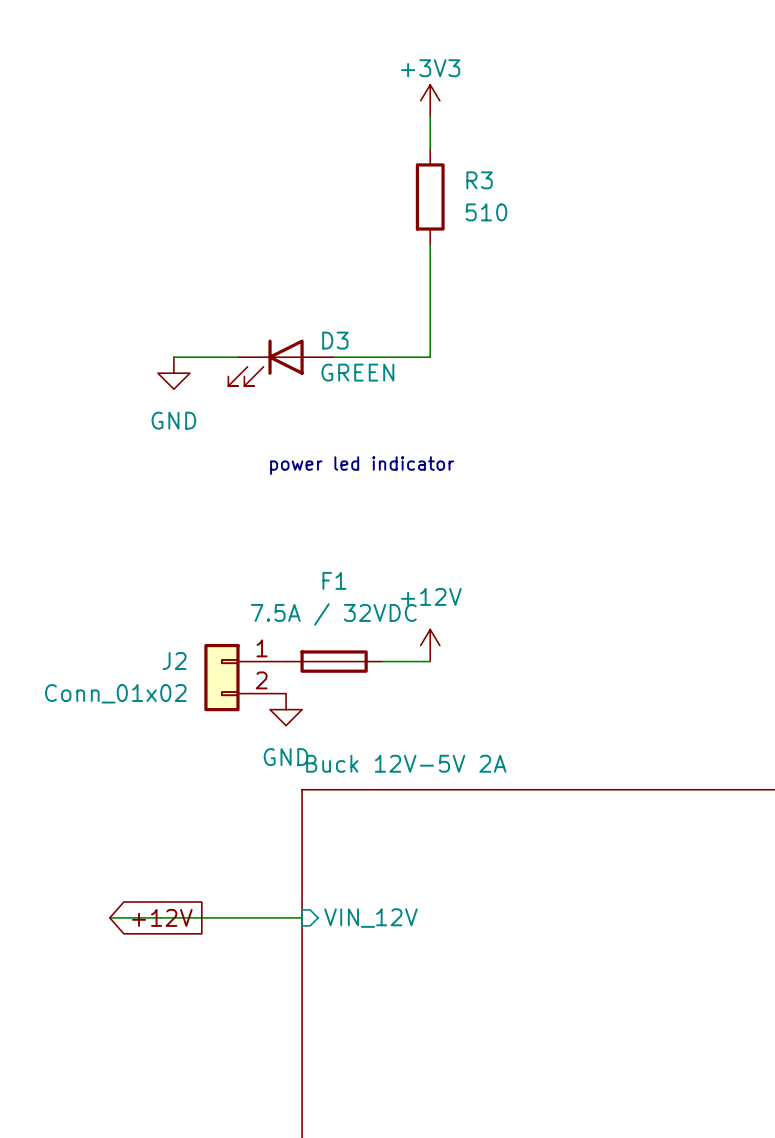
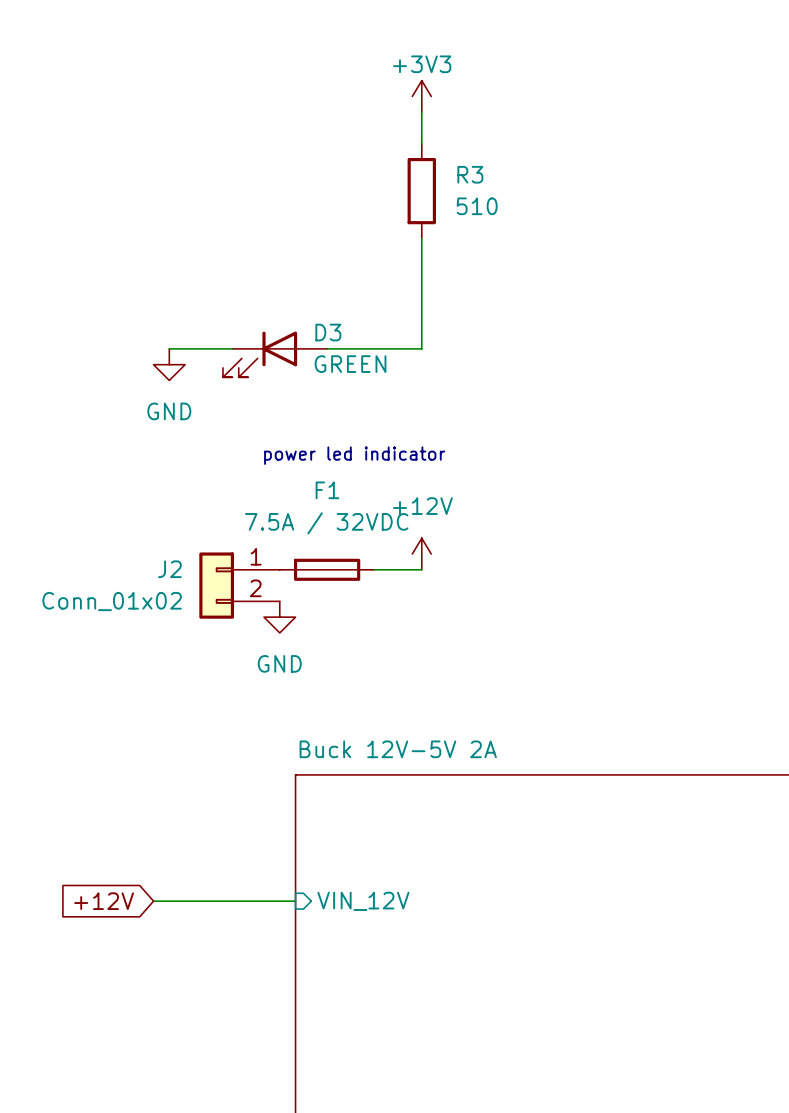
power symbol position: +12V (430, 645) -> +12V (421, 554)
F1 position: (334, 661) -> (327, 569)
wire: (382, 661) (430, 661) -> (374, 569) (421, 569)
J2 position: (245, 677) -> (239, 585)
power symbol position: GND (286, 709) -> GND (279, 617)
wire: (109, 917) (157, 917) -> none
global label rotation: 0° (162, 917) -> 180° (104, 901)

